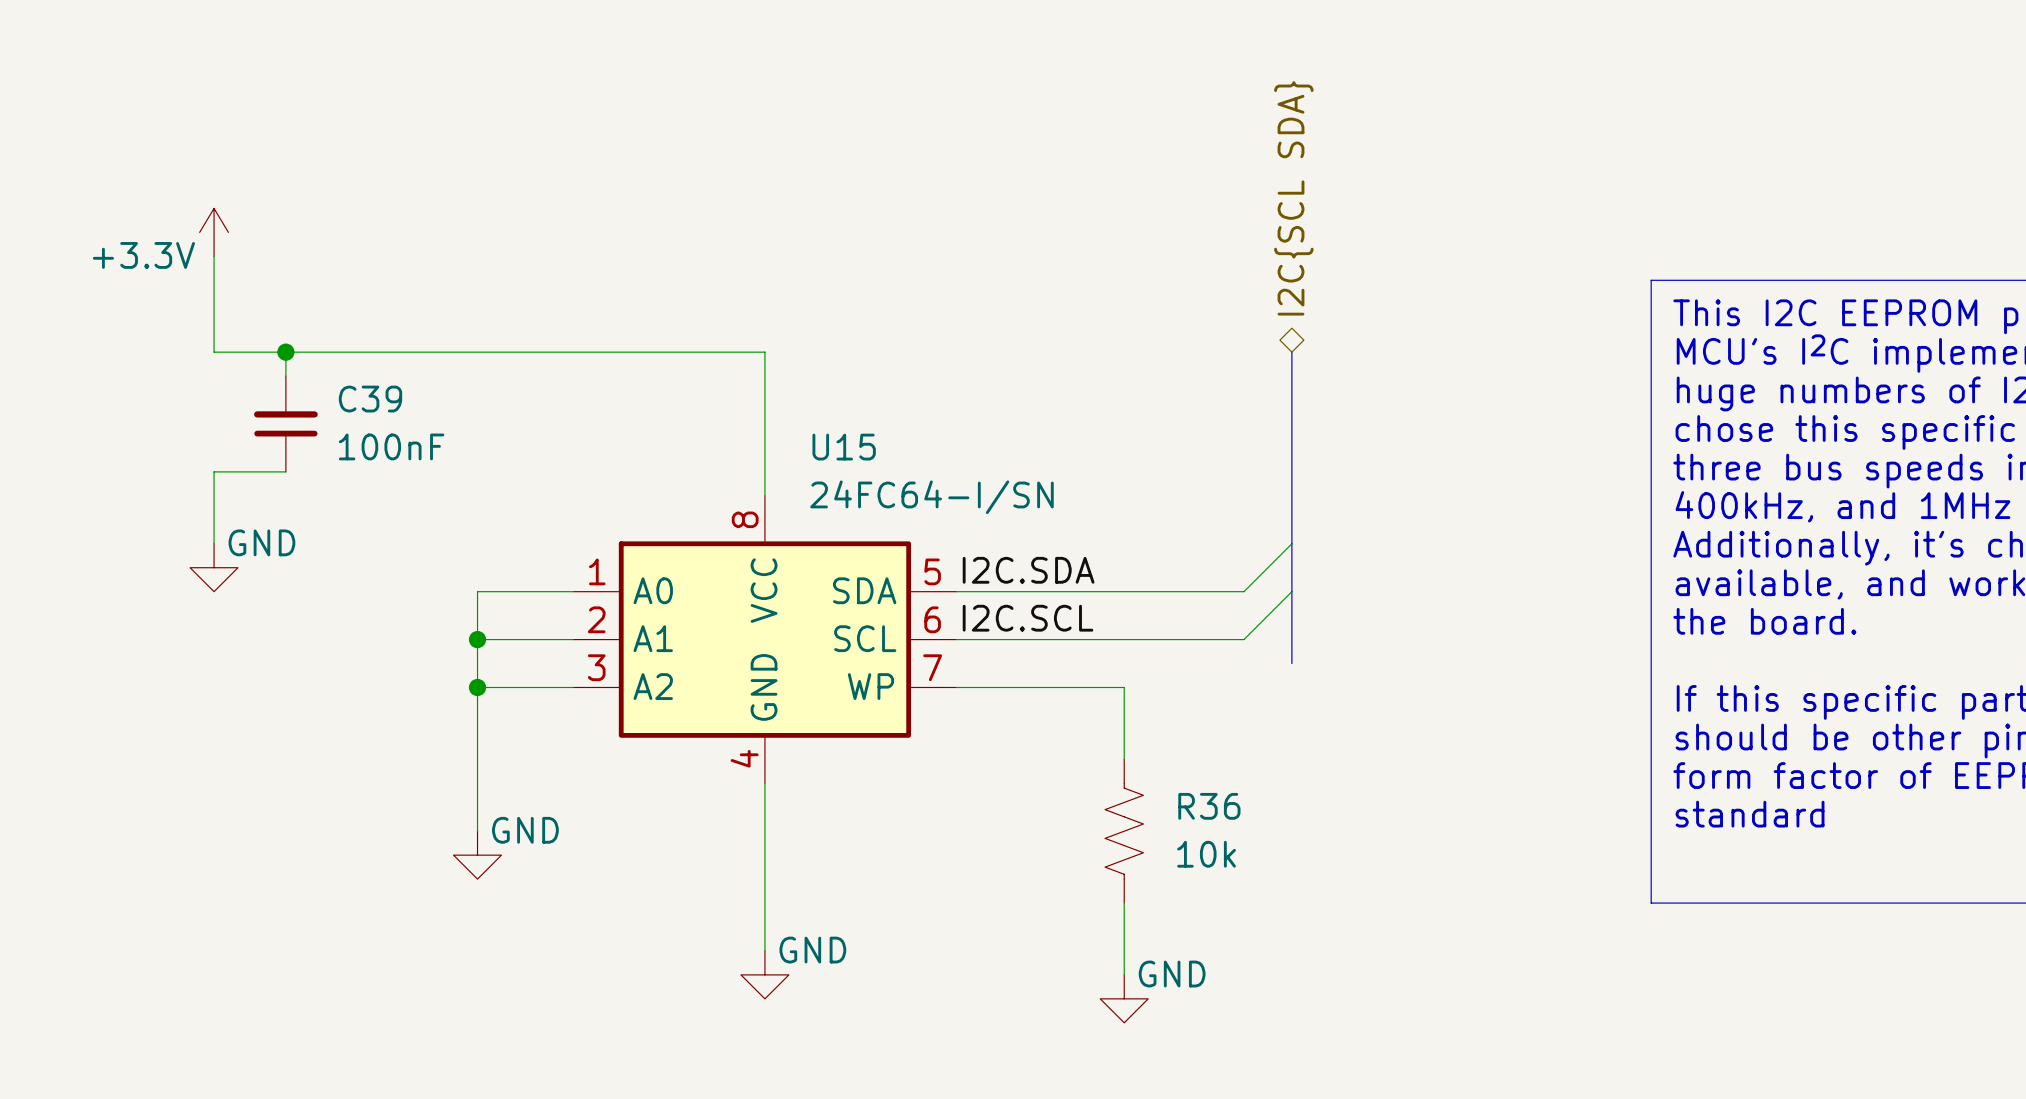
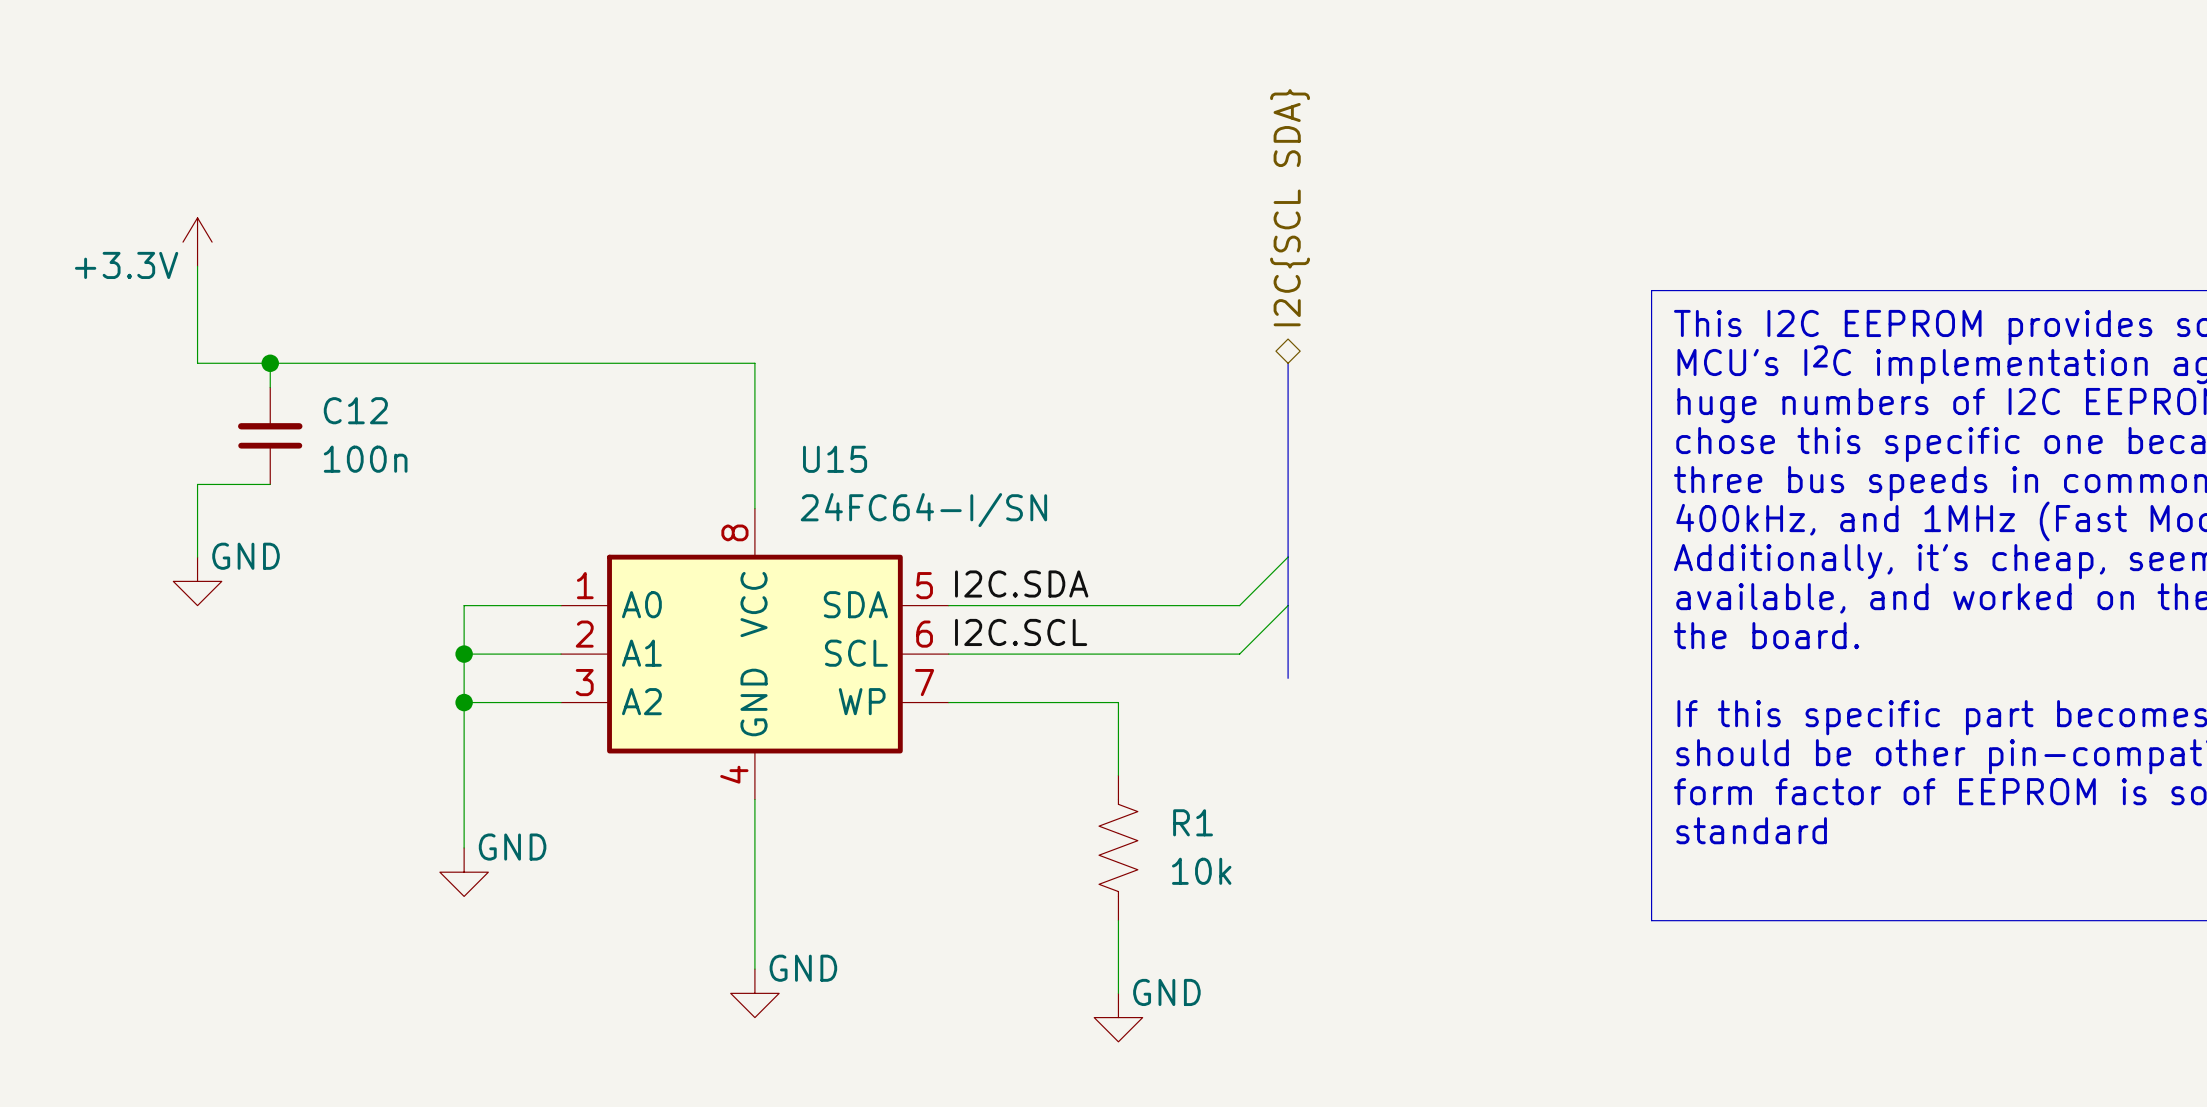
C39 name: C39 (370, 399) -> C12 (355, 410)
C39 value: 100nF (391, 446) -> 100n (365, 459)
R36 name: R36 (1209, 806) -> R1 (1193, 822)

